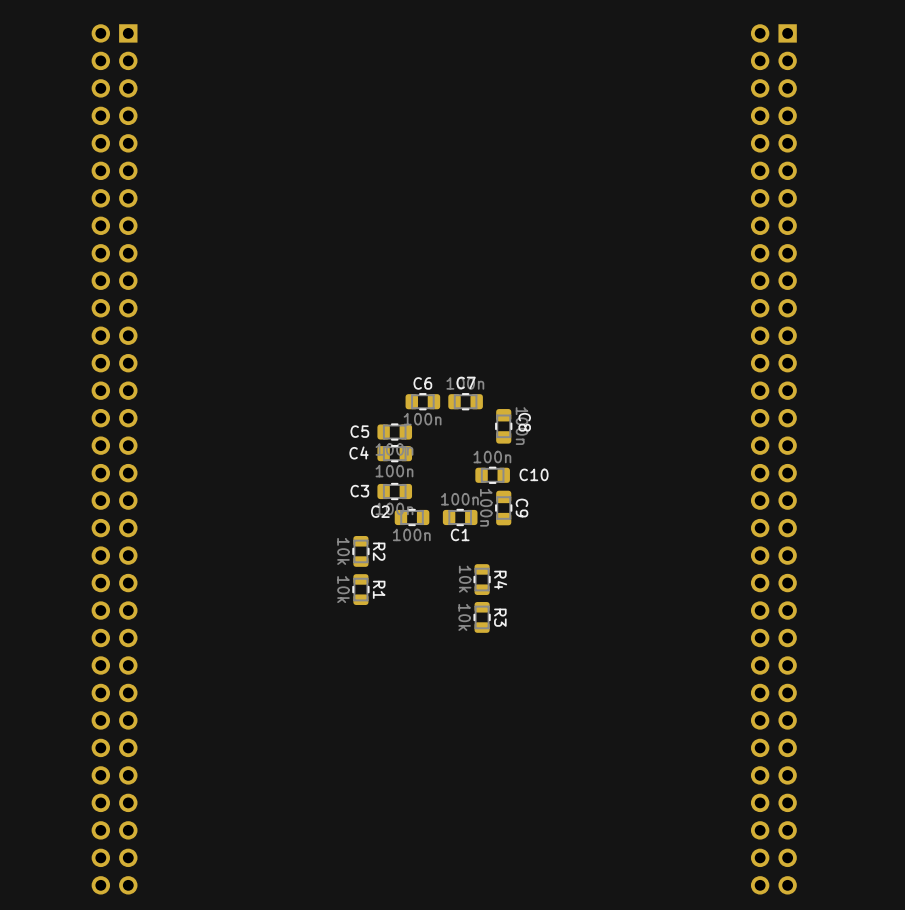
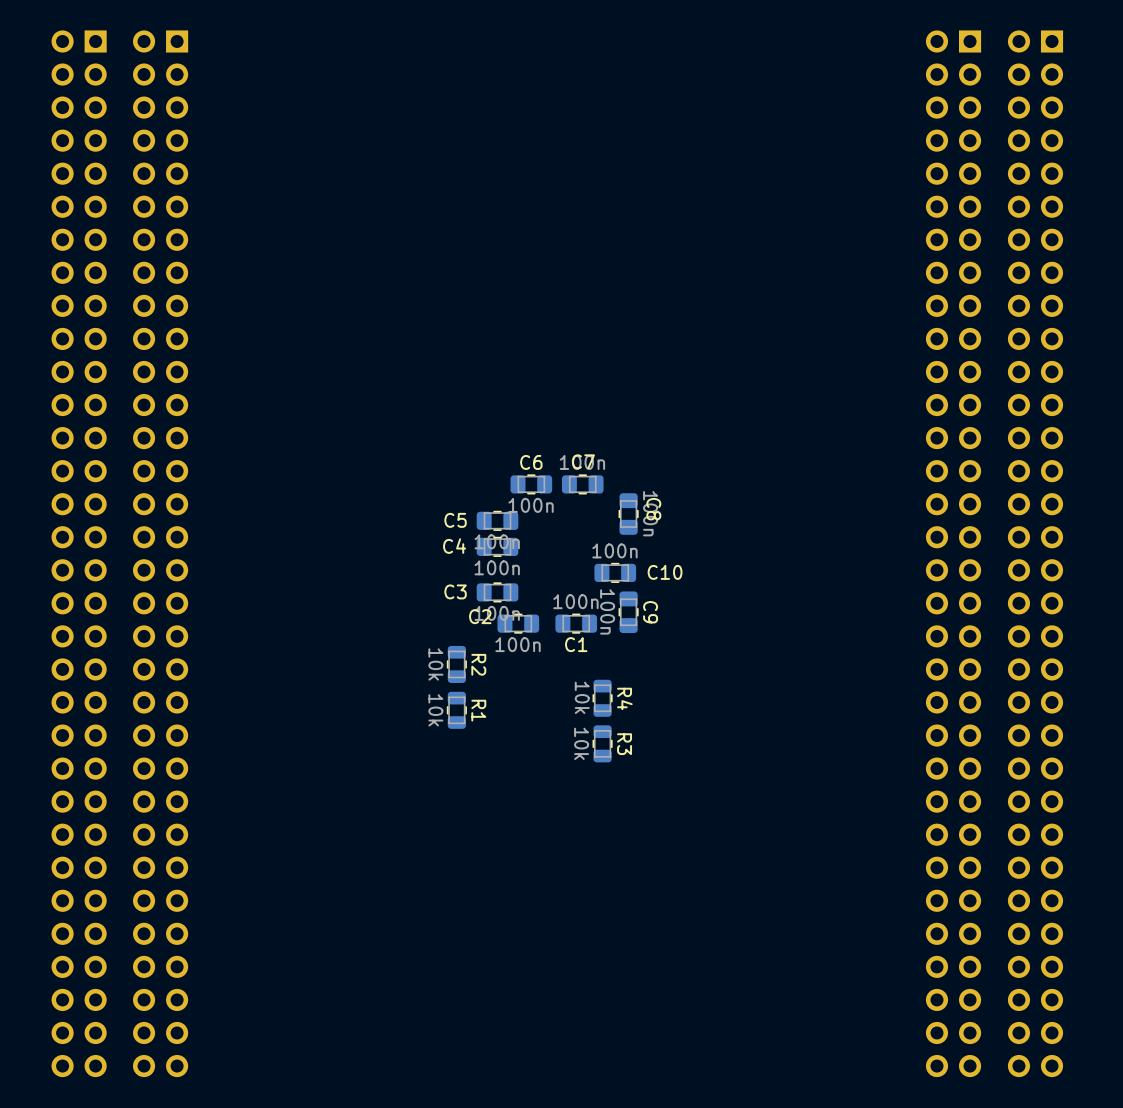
part: none -> (79, 553)
part: none -> (1035, 553)

